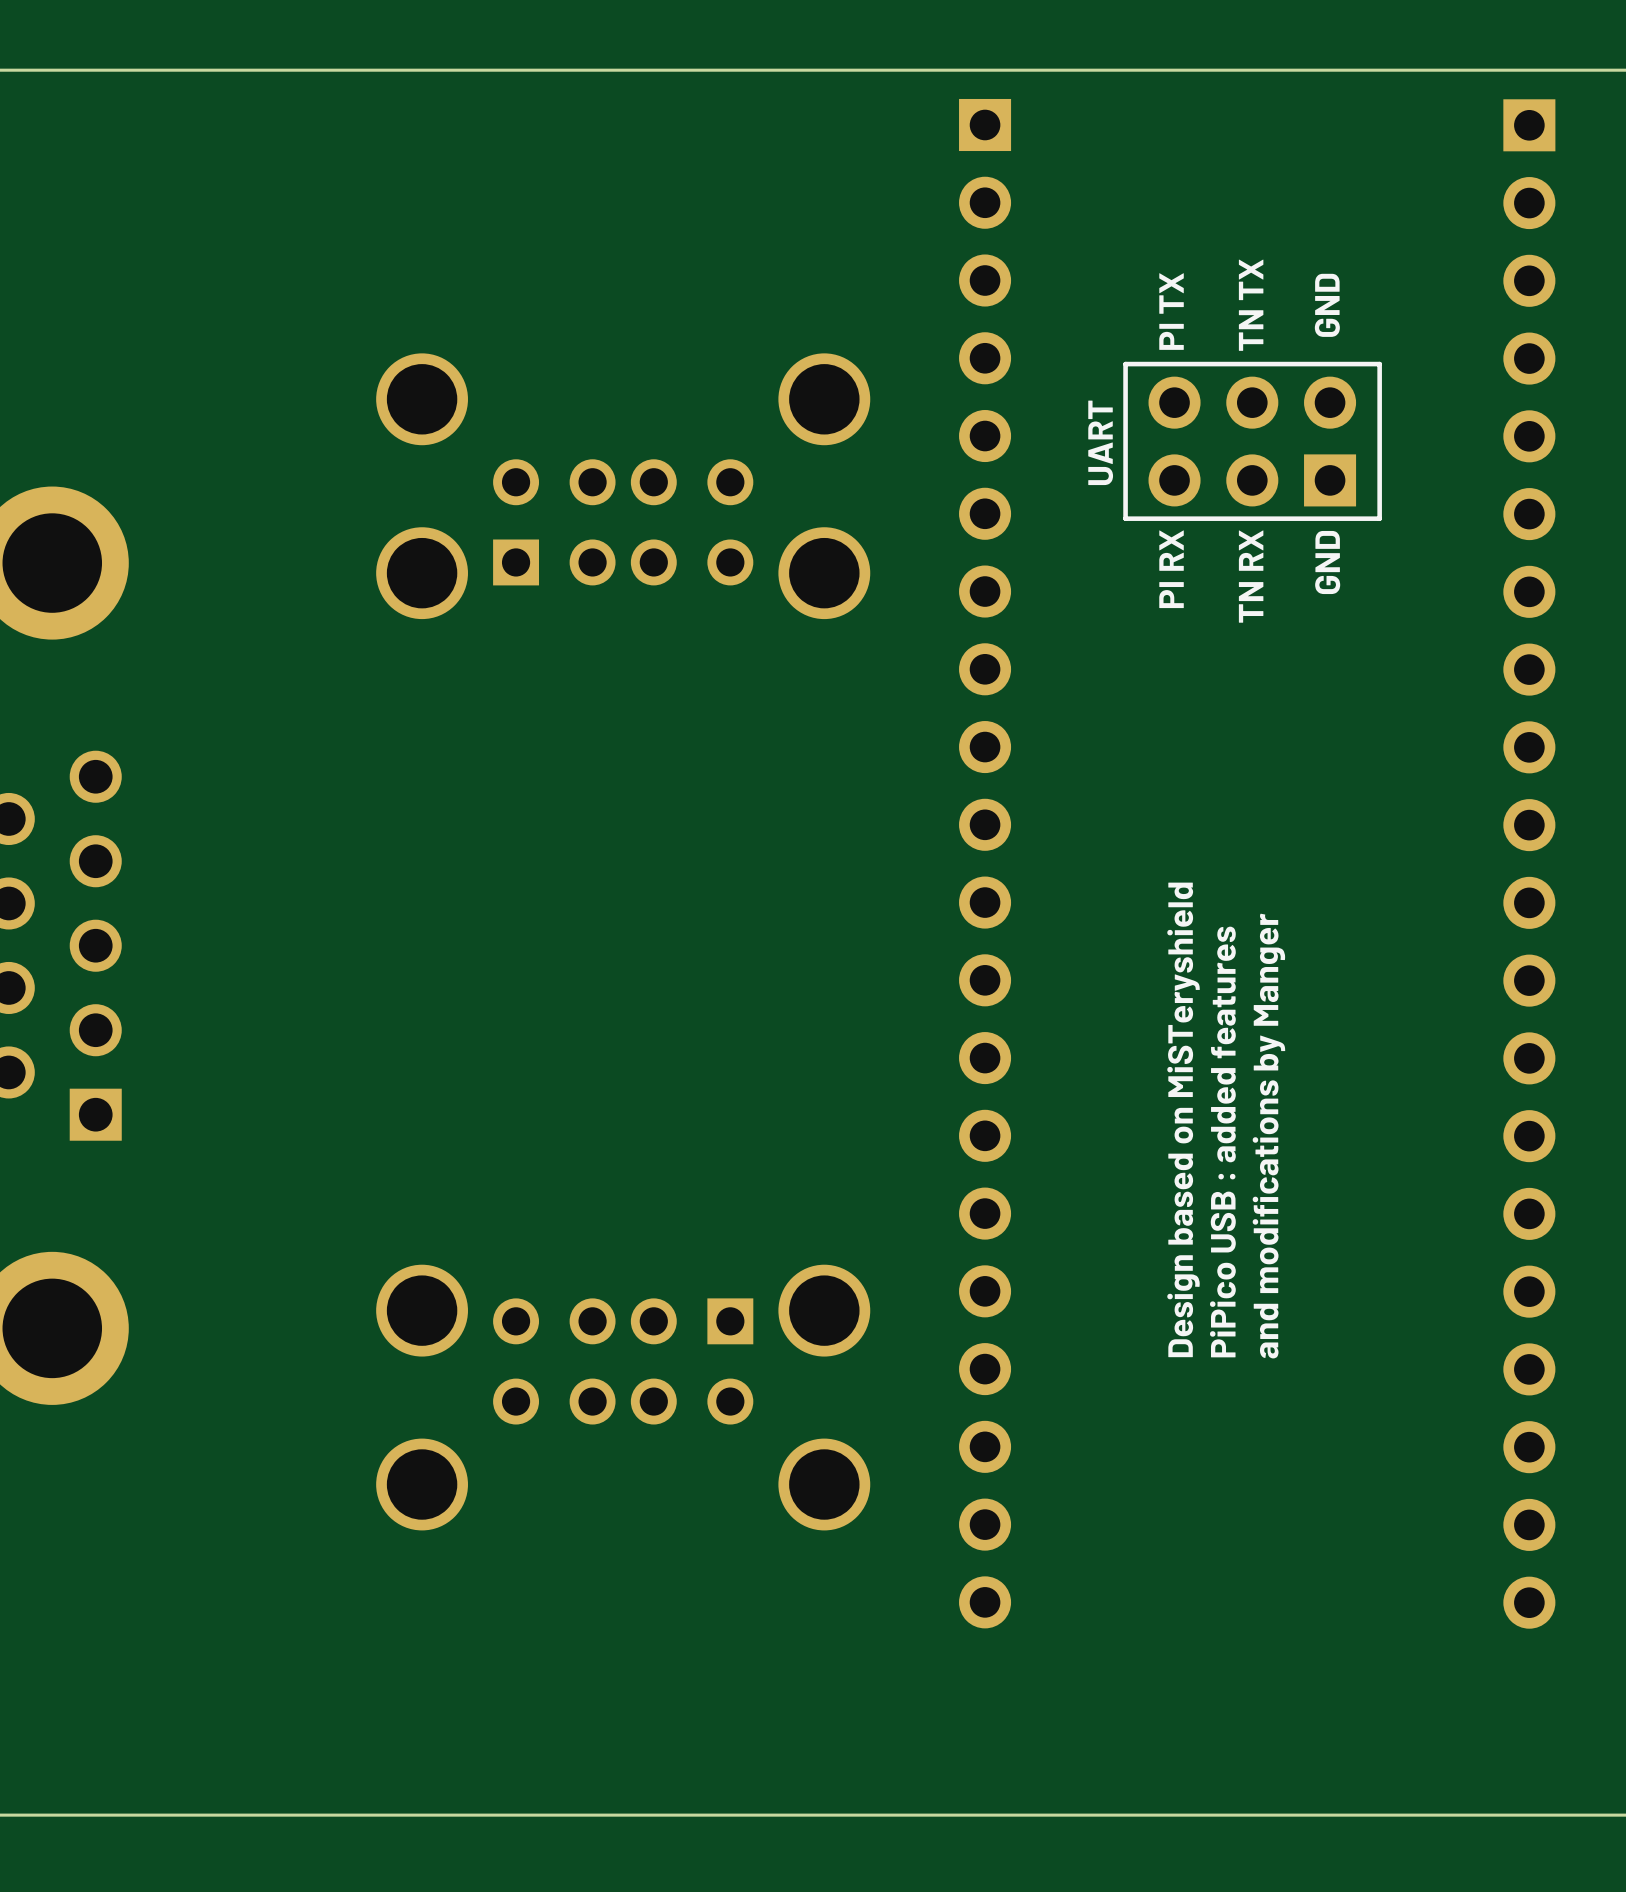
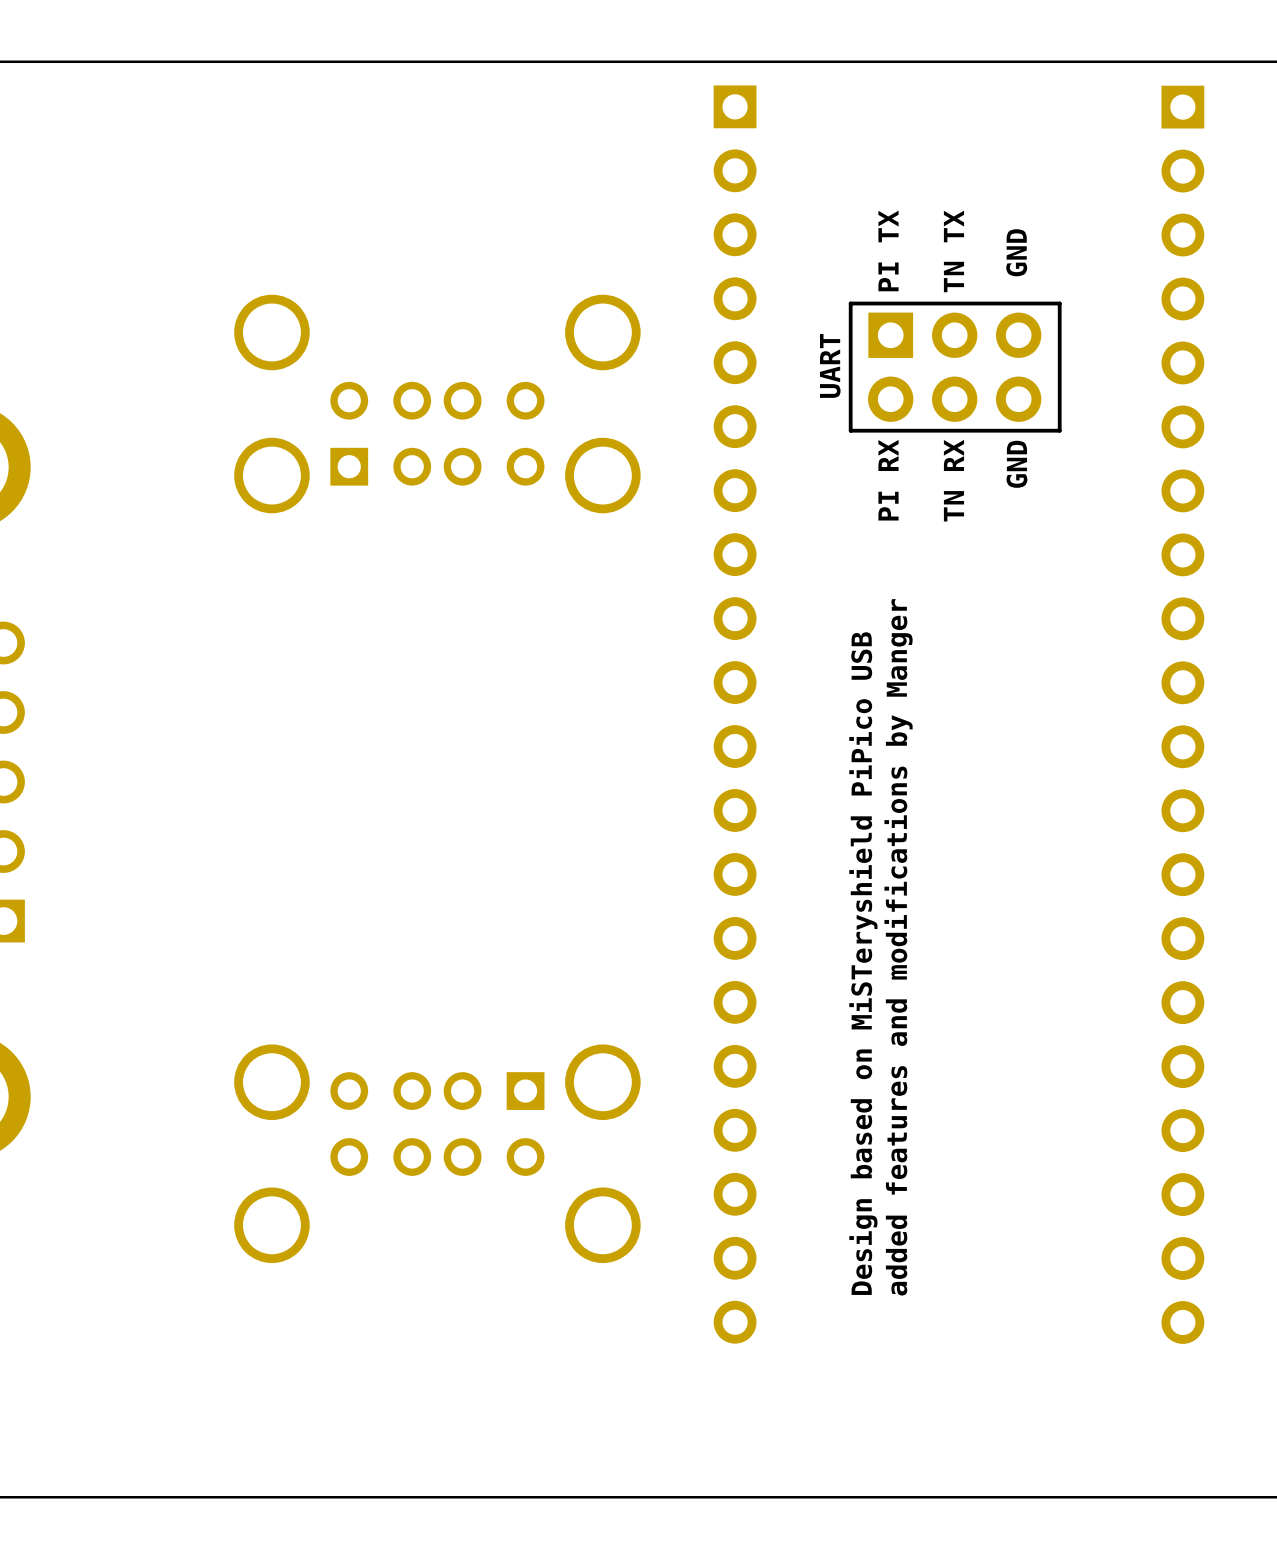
part footprint: [1148, 376, 1357, 507] -> [868, 312, 1042, 422]
text: Design based on MiSTeryshield (1183, 1119) -> Design based on MiSTeryshield PiPico USB (863, 963)
text: and modifications by Manger (1268, 1136) -> none
text: PiPico USB : added features (1222, 1142) -> none
text: none -> added features and modifications by Manger (898, 947)

